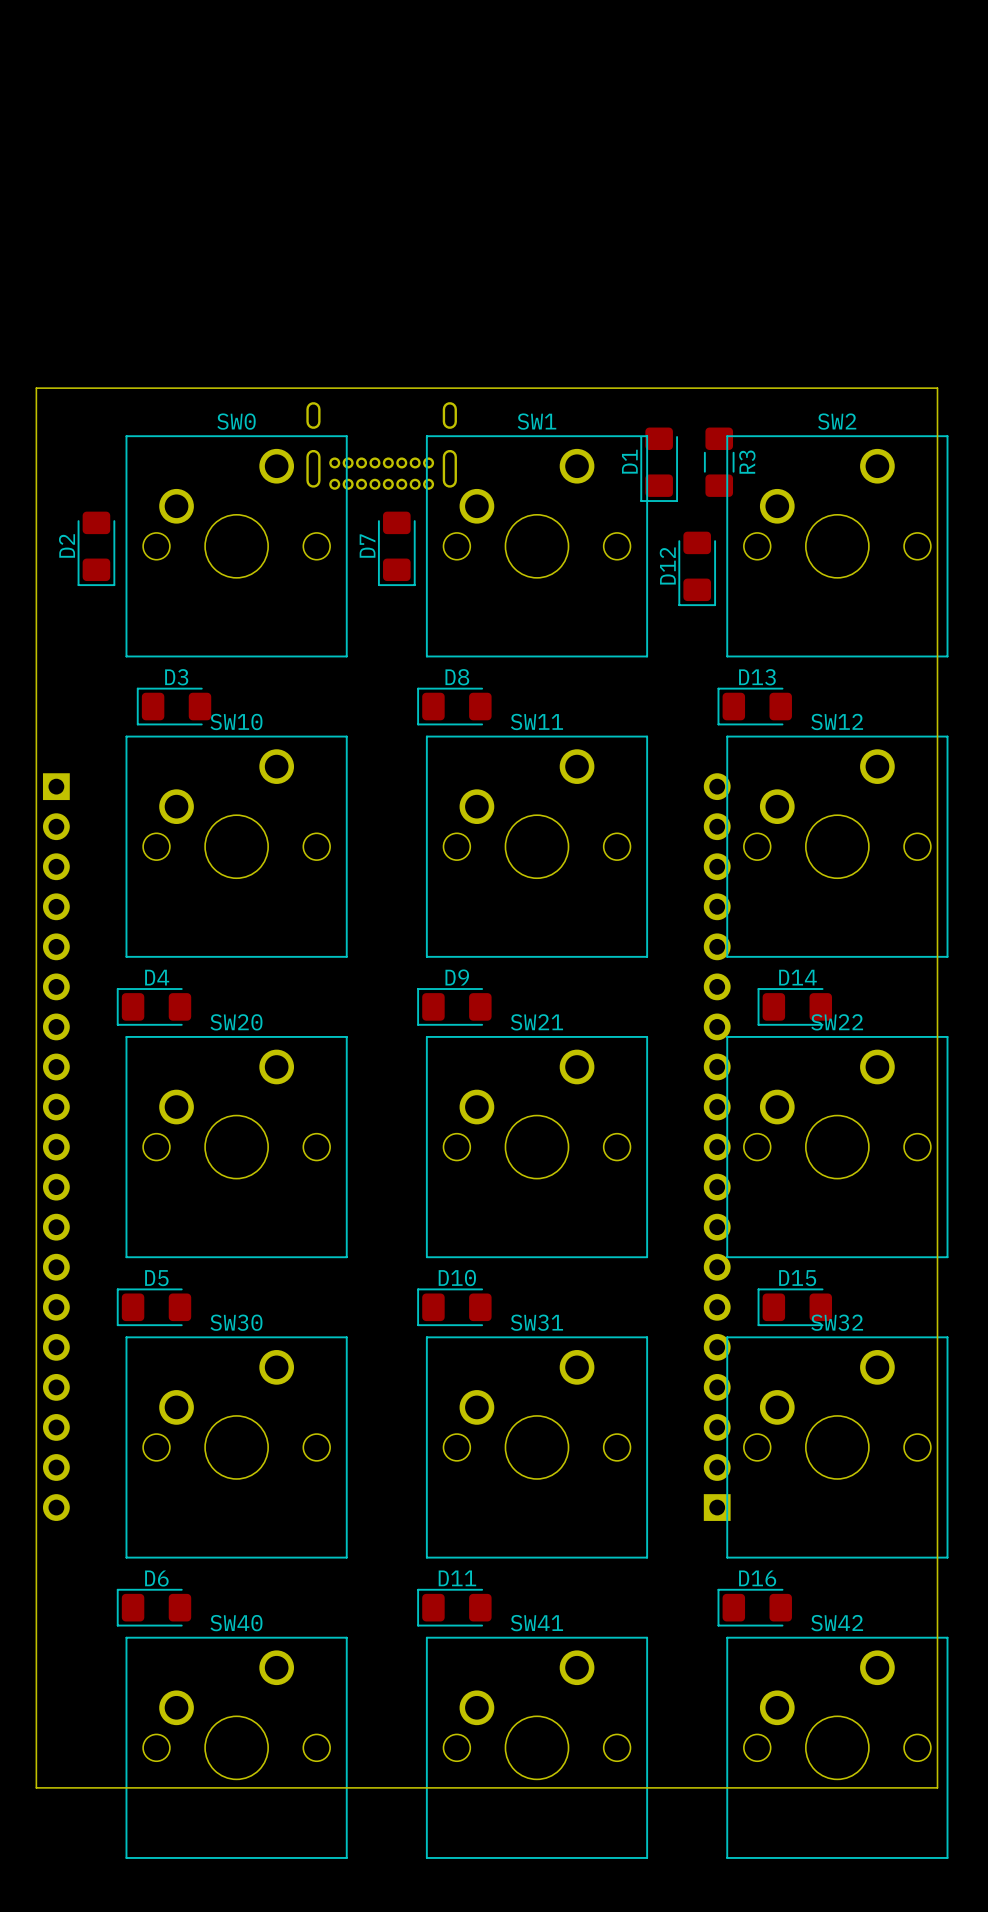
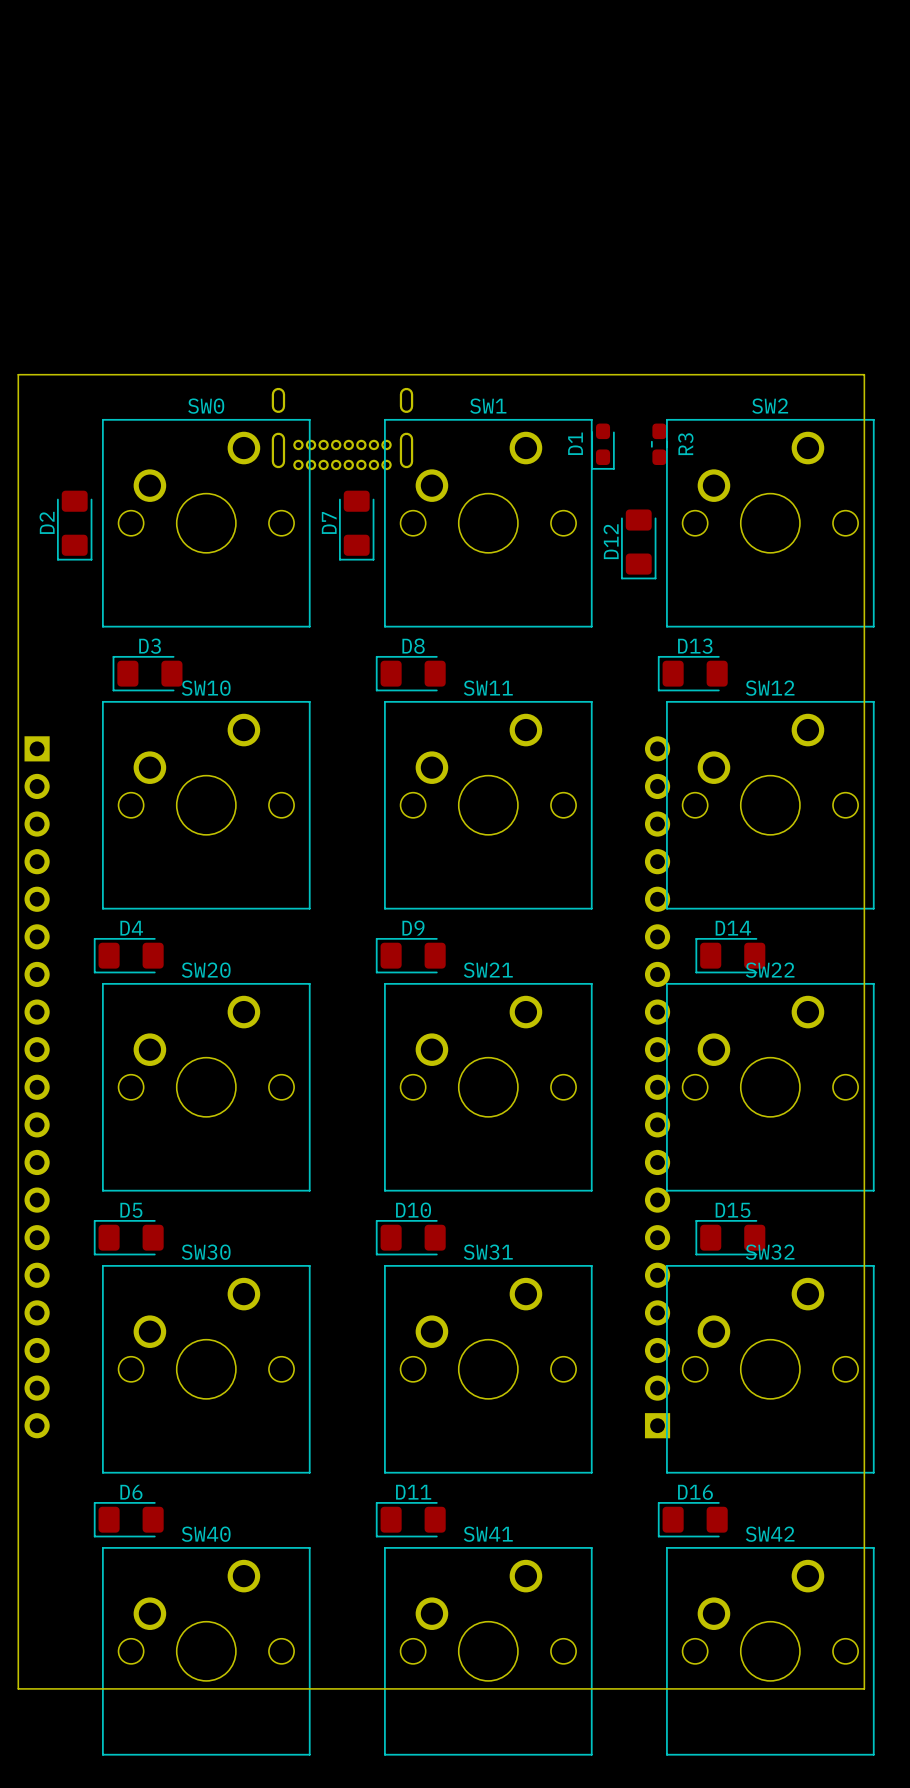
D1 footprint: [640, 427, 678, 502] -> [591, 423, 615, 470]
R3 footprint: [703, 427, 735, 497] -> [650, 423, 668, 466]

